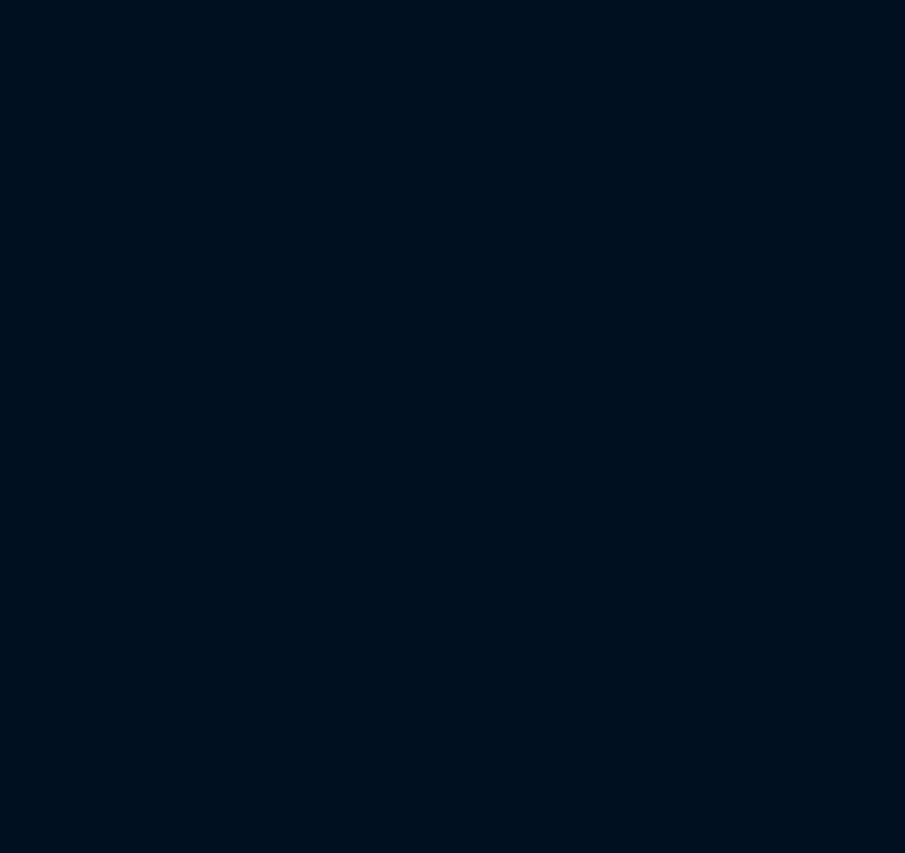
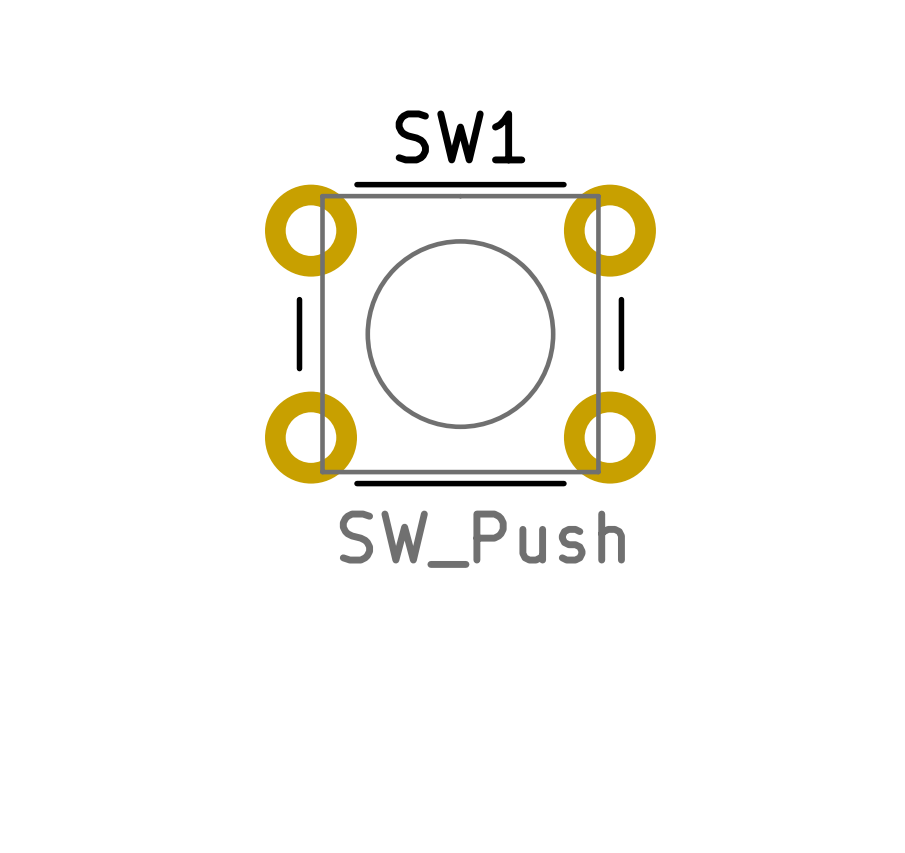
SW1: none -> SW_Push (460, 334)

